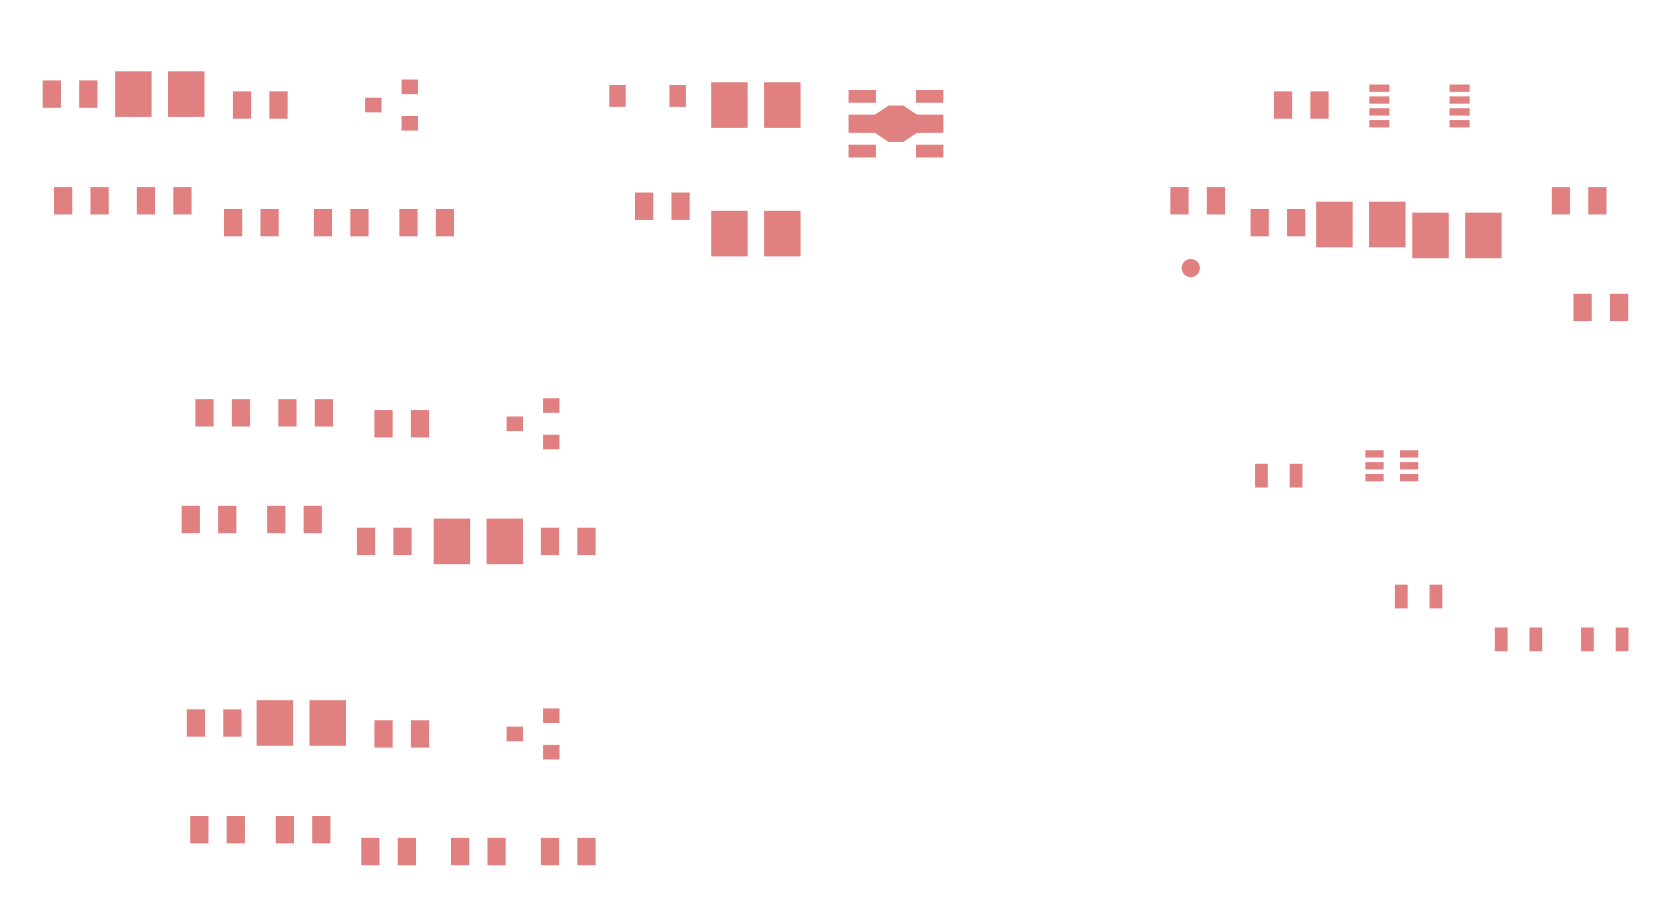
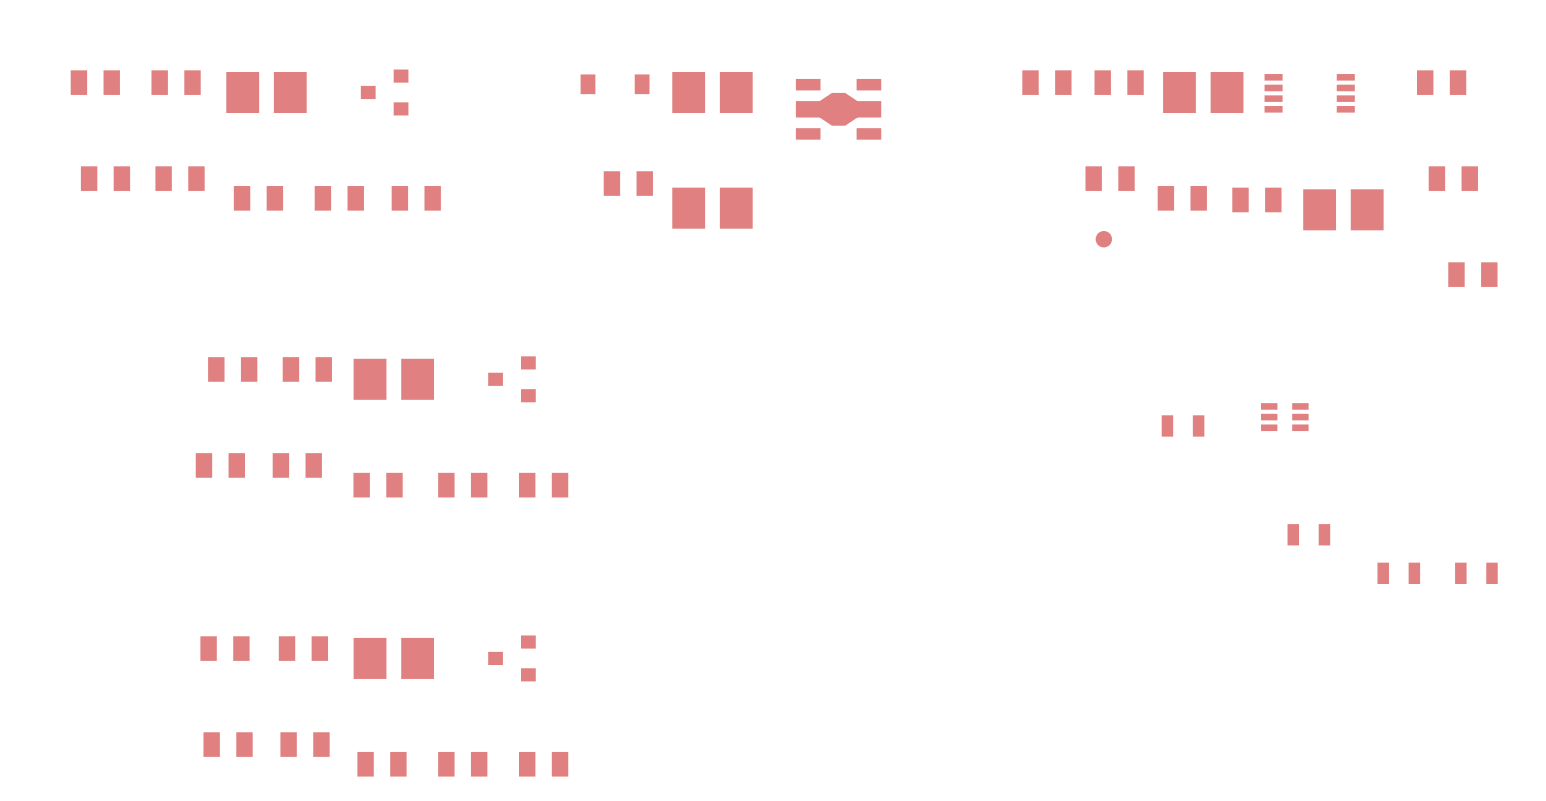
part footprint: [115, 71, 205, 117] -> [151, 70, 201, 95]
part footprint: [232, 91, 288, 119] -> [226, 71, 307, 113]
part footprint: [1273, 91, 1329, 119] -> [1163, 71, 1244, 113]
part: none -> (1046, 82)
part: none -> (1119, 82)
part: none -> (1441, 82)
part footprint: [1316, 201, 1406, 248] -> [1232, 187, 1282, 213]
part footprint: [374, 410, 430, 438] -> [353, 358, 435, 400]
part footprint: [433, 518, 524, 565] -> [438, 472, 488, 498]
part footprint: [256, 700, 346, 746] -> [278, 636, 329, 661]
part footprint: [374, 720, 430, 748] -> [353, 637, 435, 679]

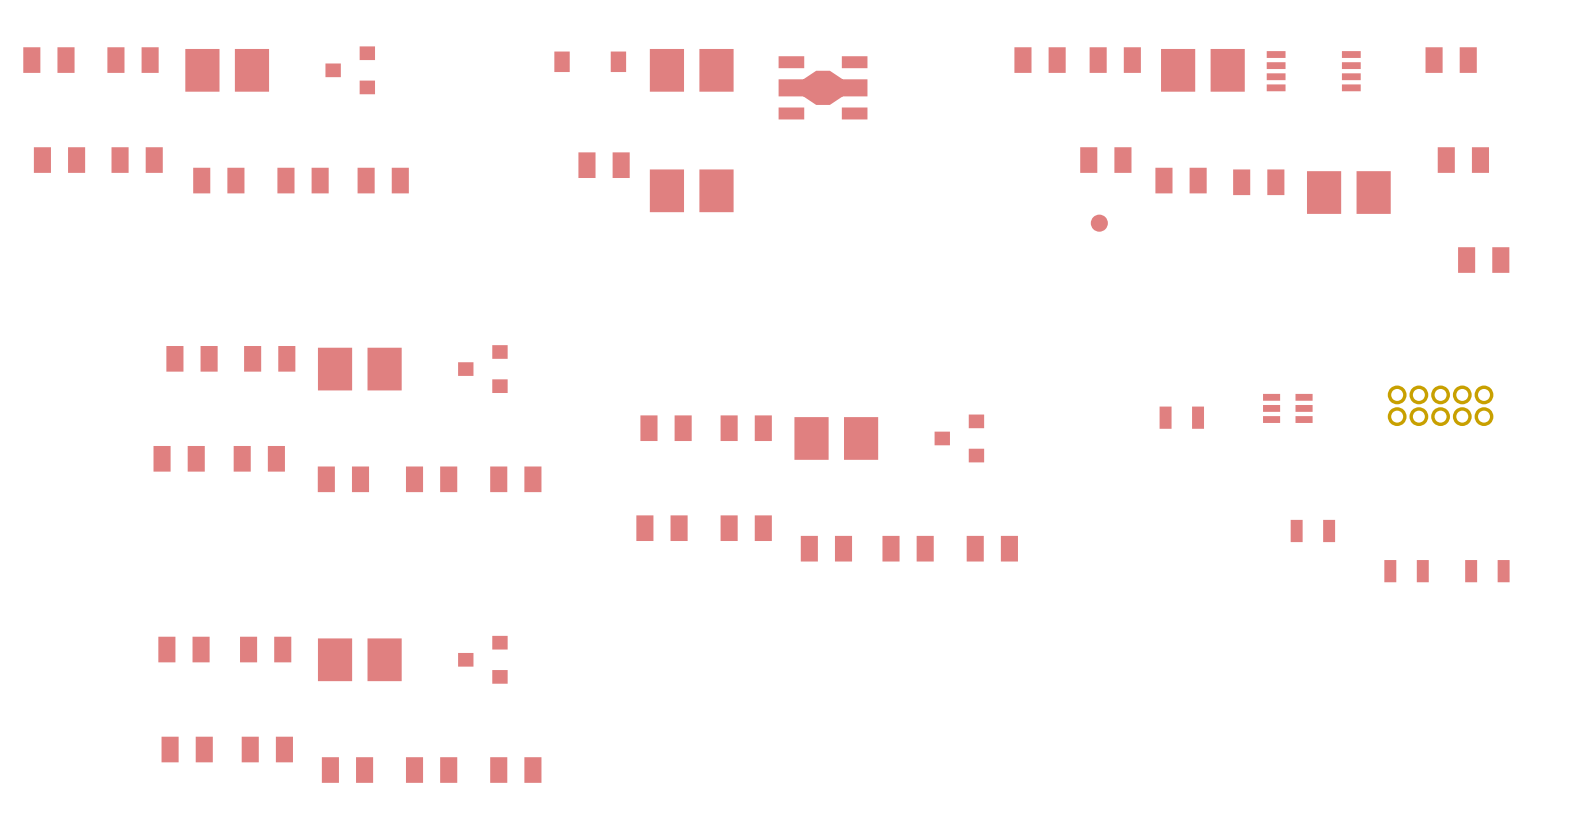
part: none -> (1440, 405)
part: none -> (666, 428)
part: none -> (746, 428)
part: none -> (836, 438)
part: none -> (959, 438)
part: none -> (661, 528)
part: none -> (746, 528)
part: none -> (826, 548)
part: none -> (908, 548)
part: none -> (992, 548)

